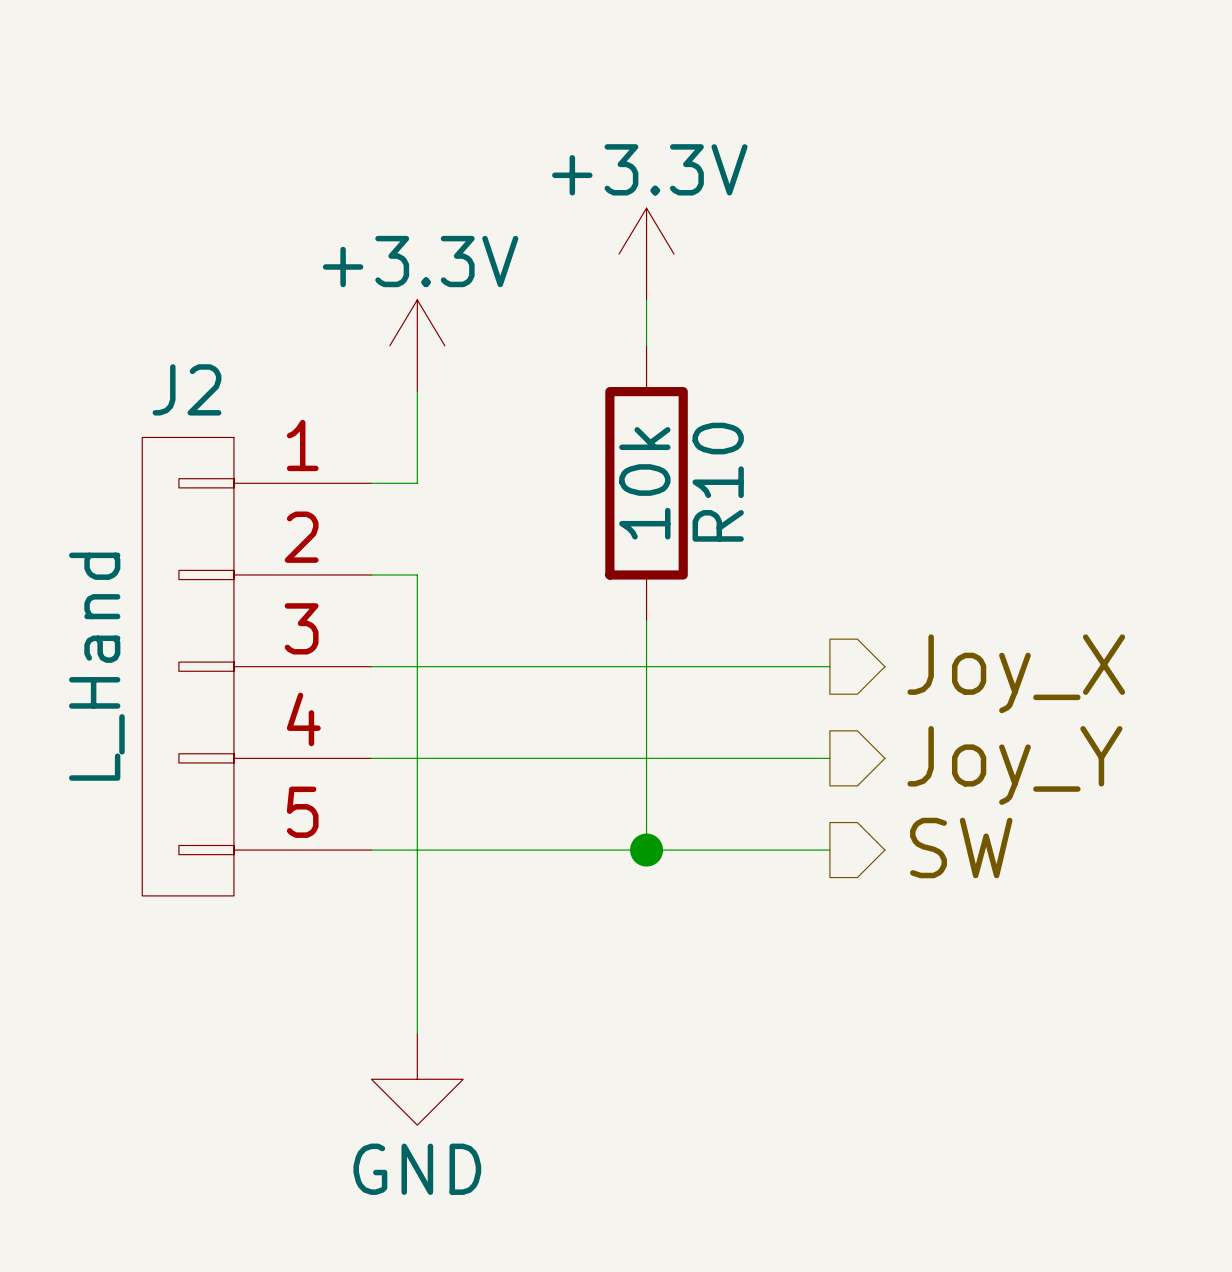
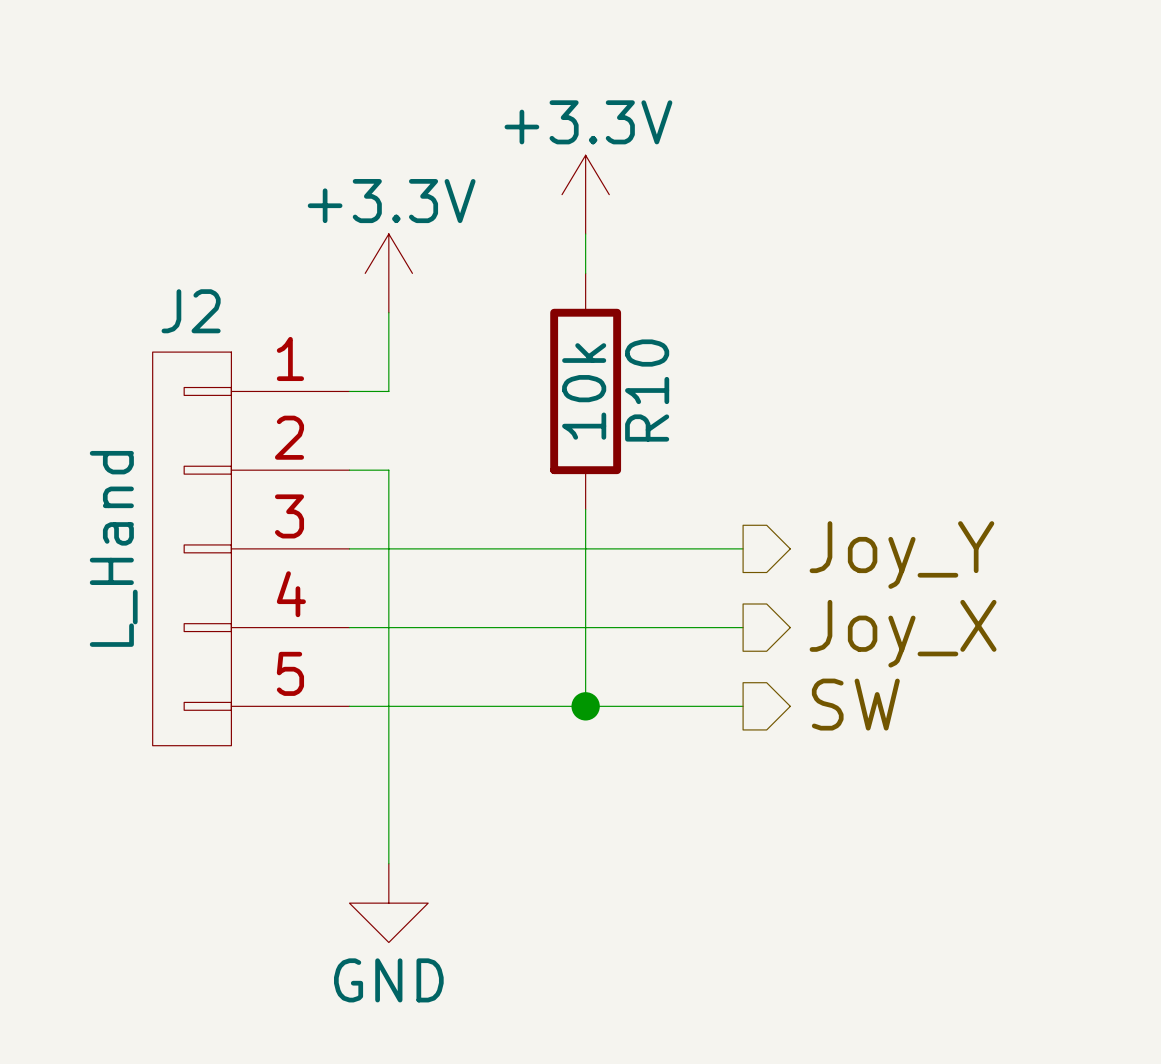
hierarchical label: Joy_X (1016, 673) -> Joy_Y (901, 555)
hierarchical label: Joy_Y (1014, 765) -> Joy_X (903, 633)

